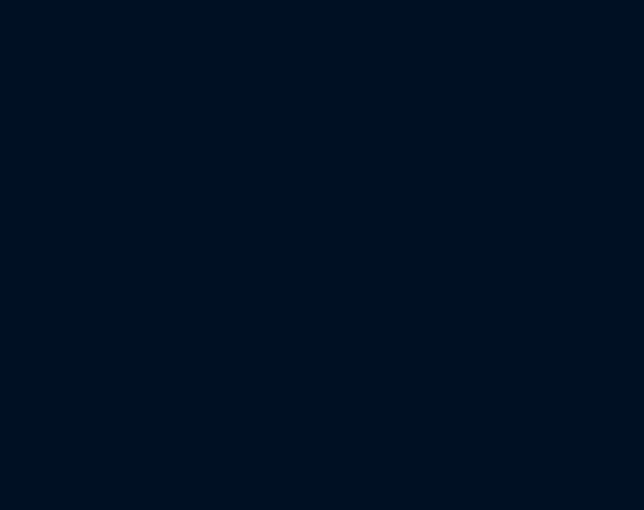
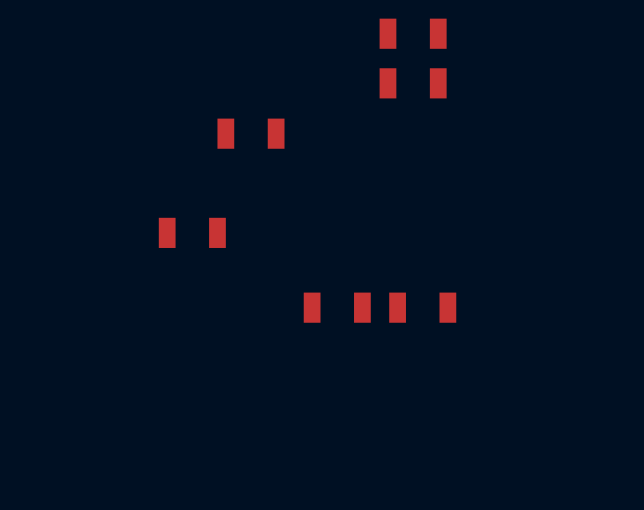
part: none -> (413, 33)
part: none -> (413, 83)
part: none -> (250, 133)
part: none -> (192, 232)
part: none -> (337, 307)
part: none -> (422, 307)

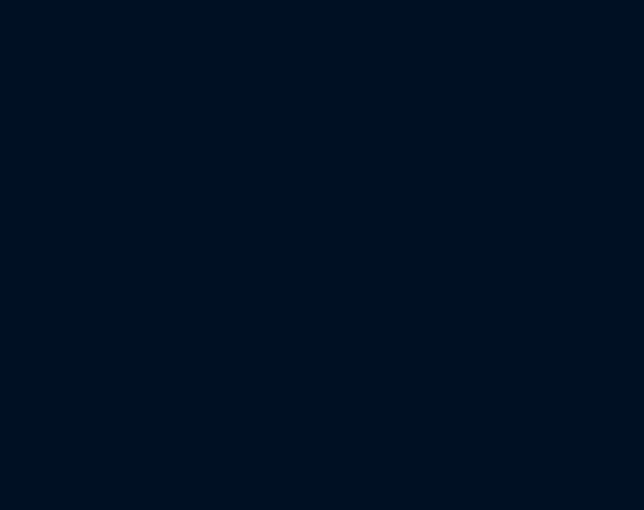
part: (413, 33) -> none
part: (413, 83) -> none
part: (250, 133) -> none
part: (192, 232) -> none
part: (337, 307) -> none
part: (422, 307) -> none

